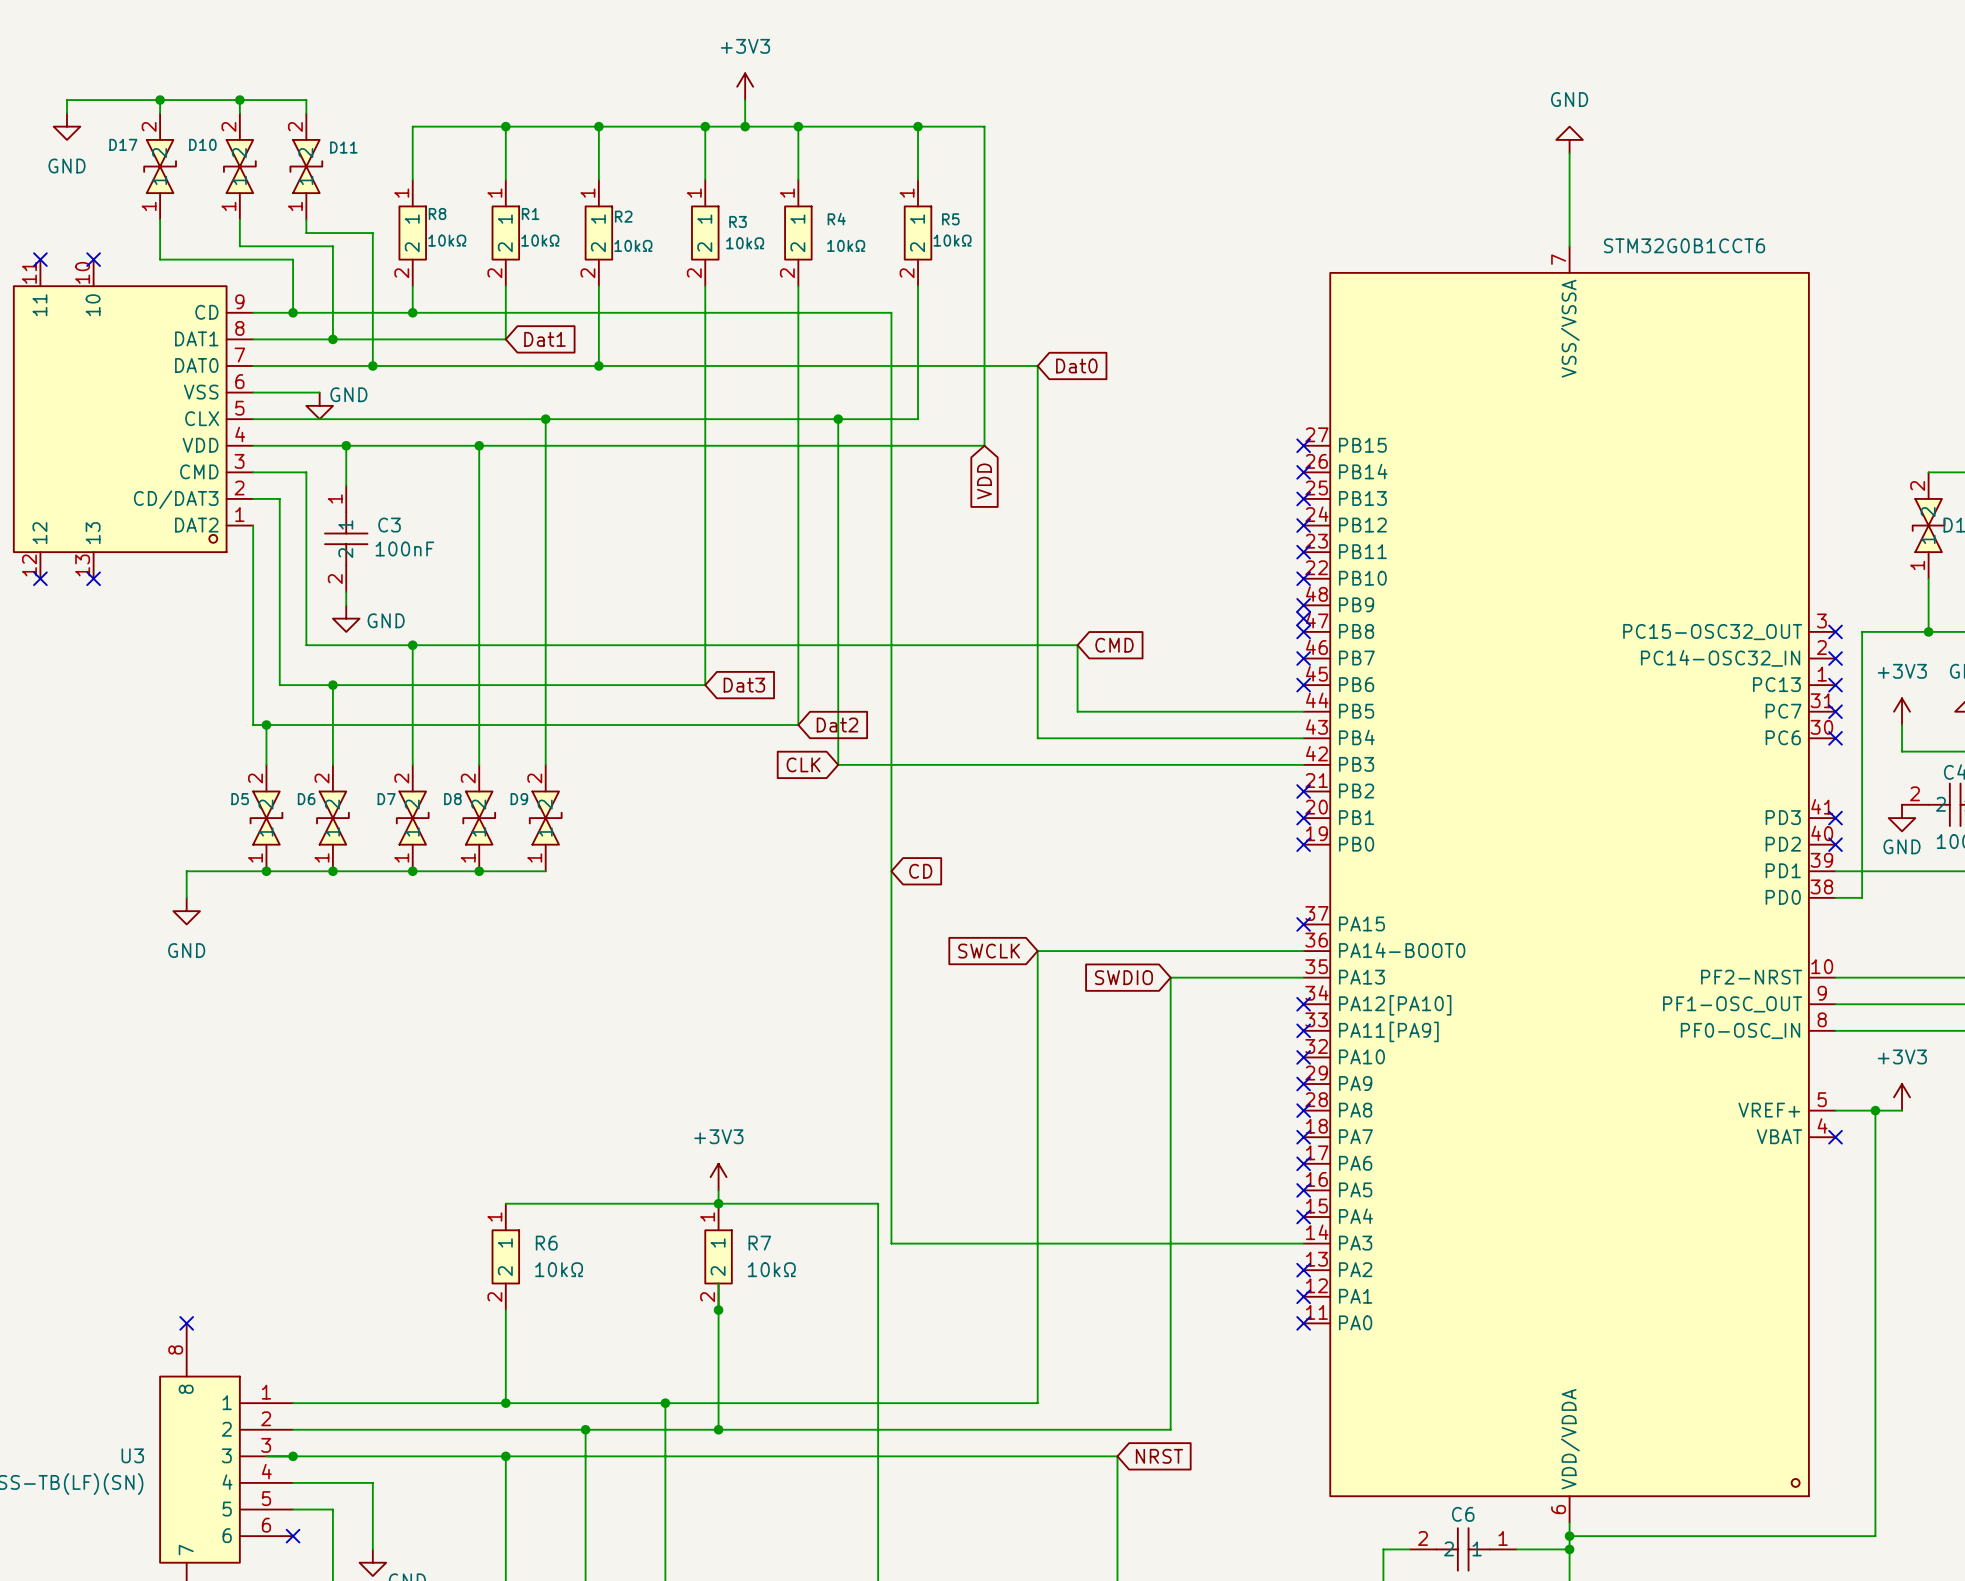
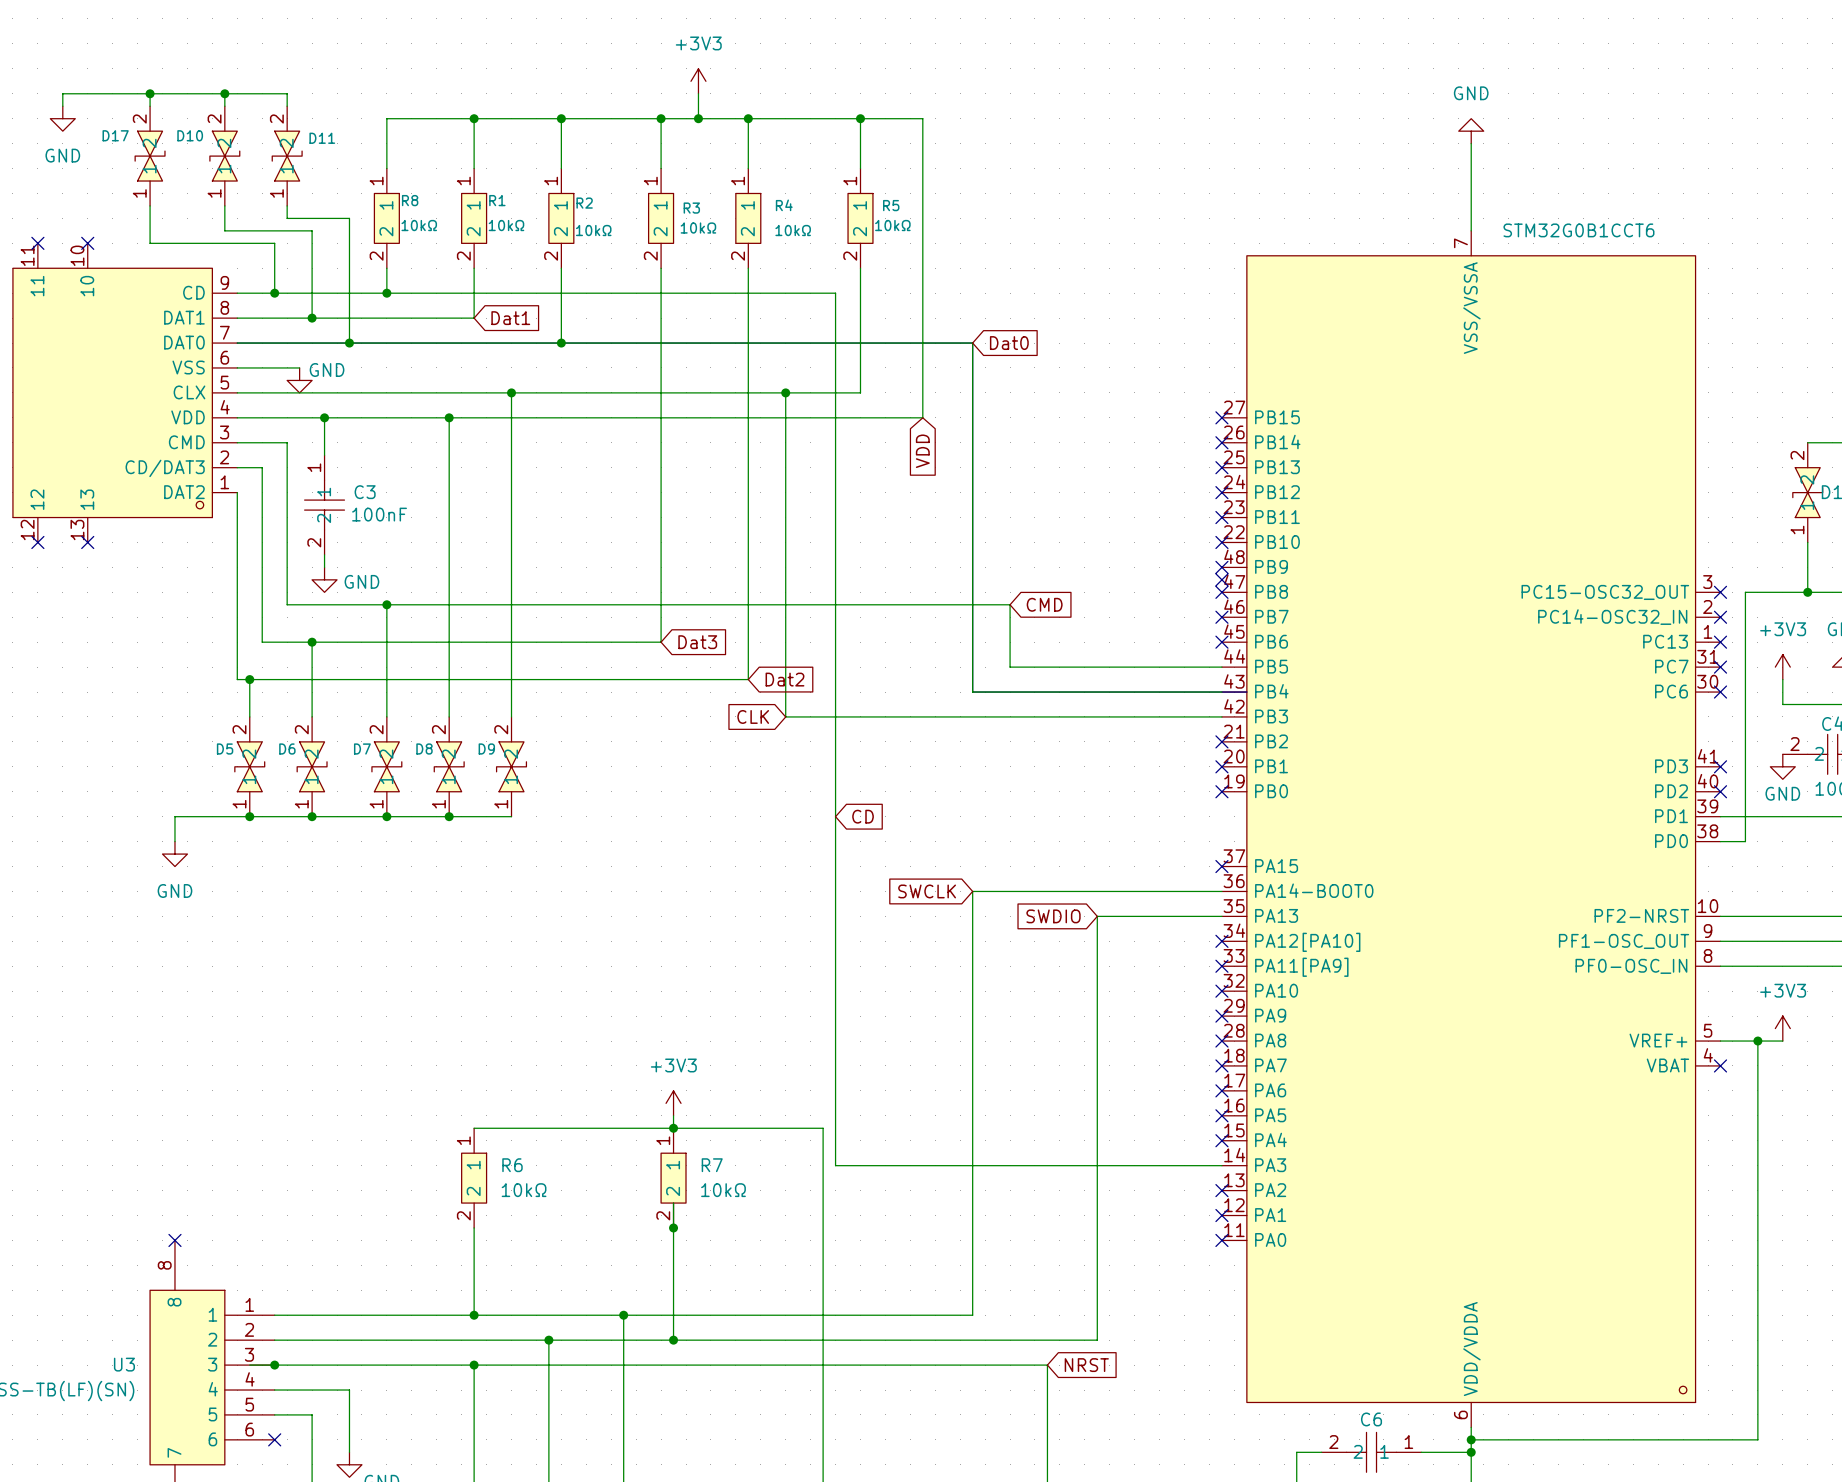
bus: none -> (237, 343) (972, 343) (972, 692) (1246, 692)

